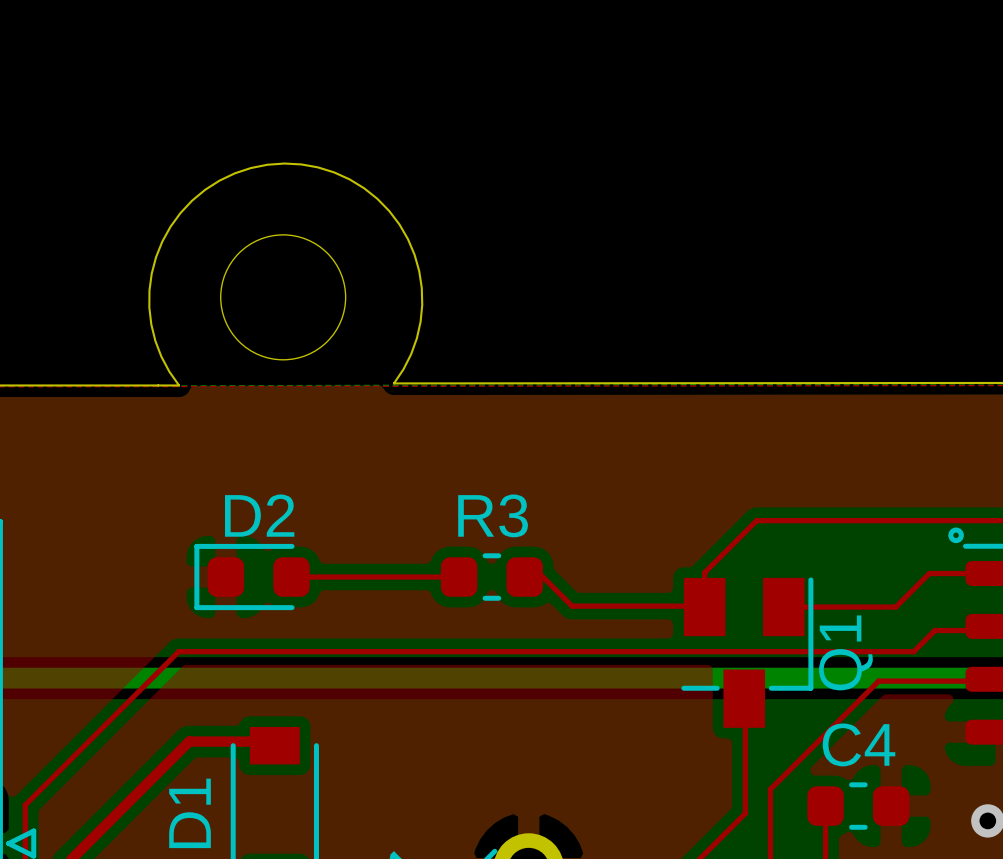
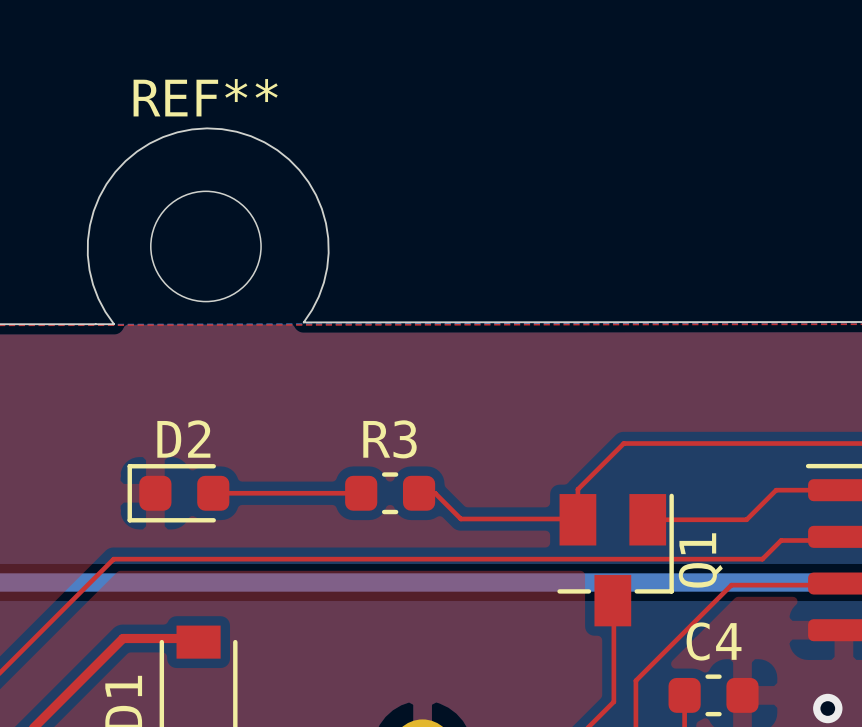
REF** name: none -> REF** (205, 97)
drawing: [948, 527, 964, 544] -> none

